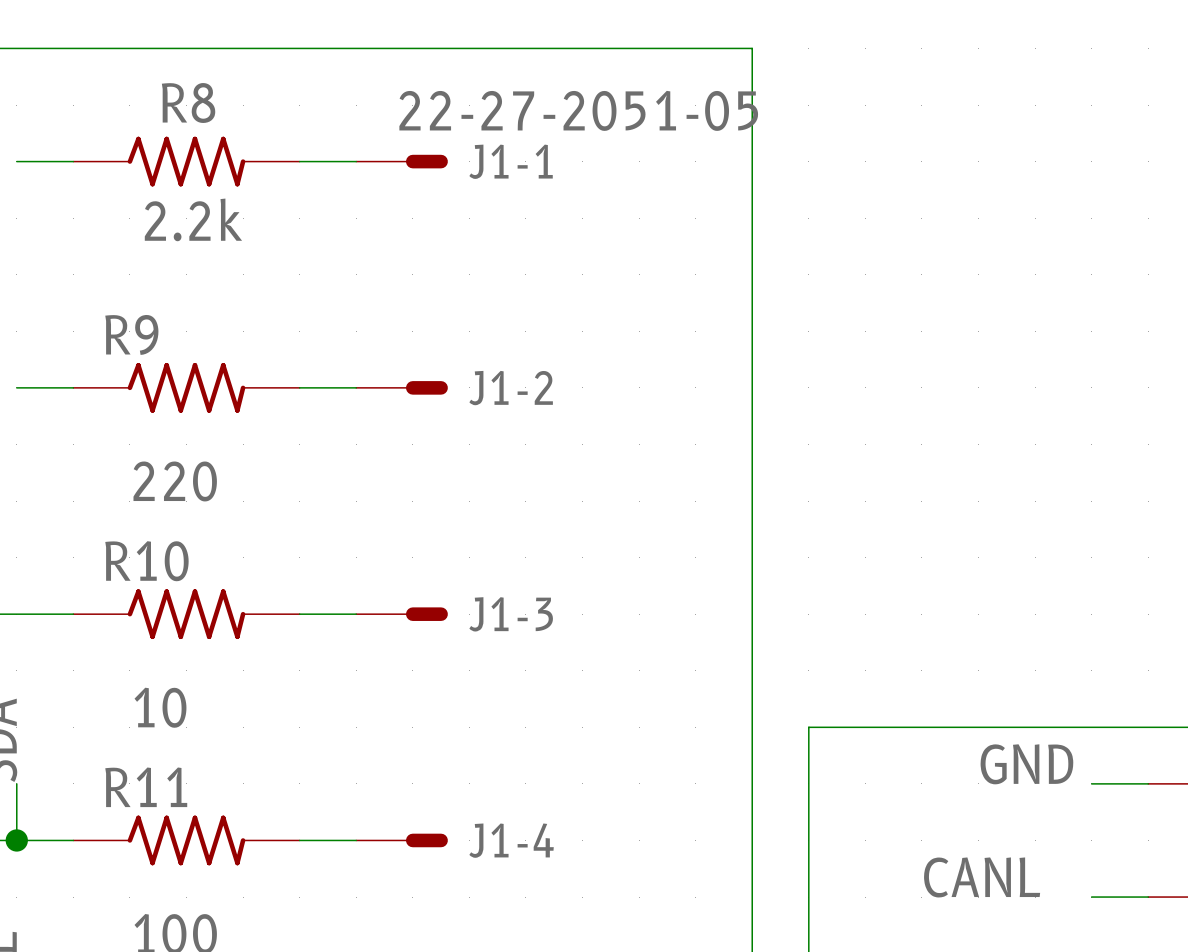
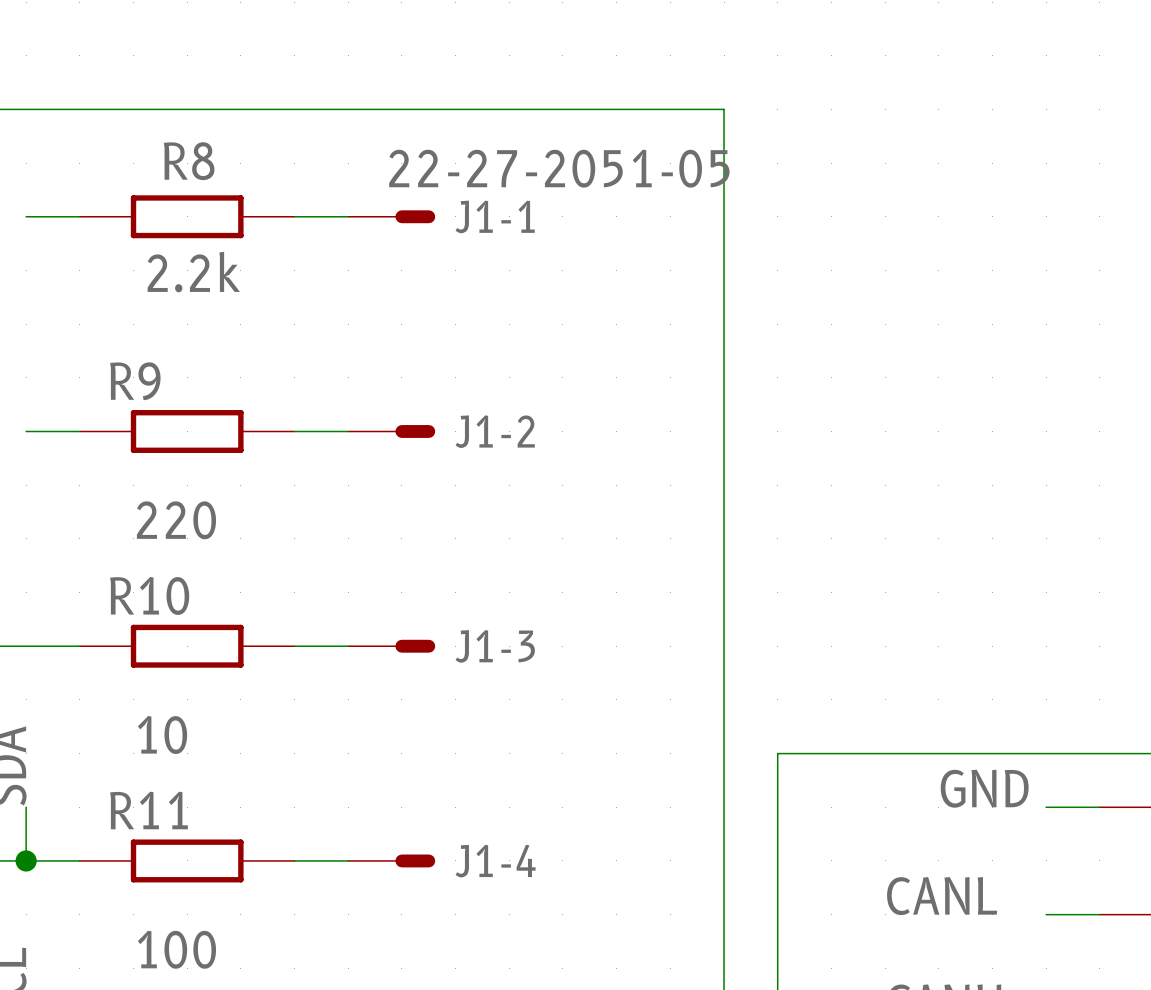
R8 symbol: [73, 136, 300, 187] -> [79, 195, 295, 239]
R9 symbol: [73, 362, 300, 413] -> [79, 410, 295, 453]
R10 symbol: [73, 589, 300, 640] -> [79, 624, 295, 668]
R11 symbol: [73, 815, 300, 866] -> [79, 839, 295, 883]

